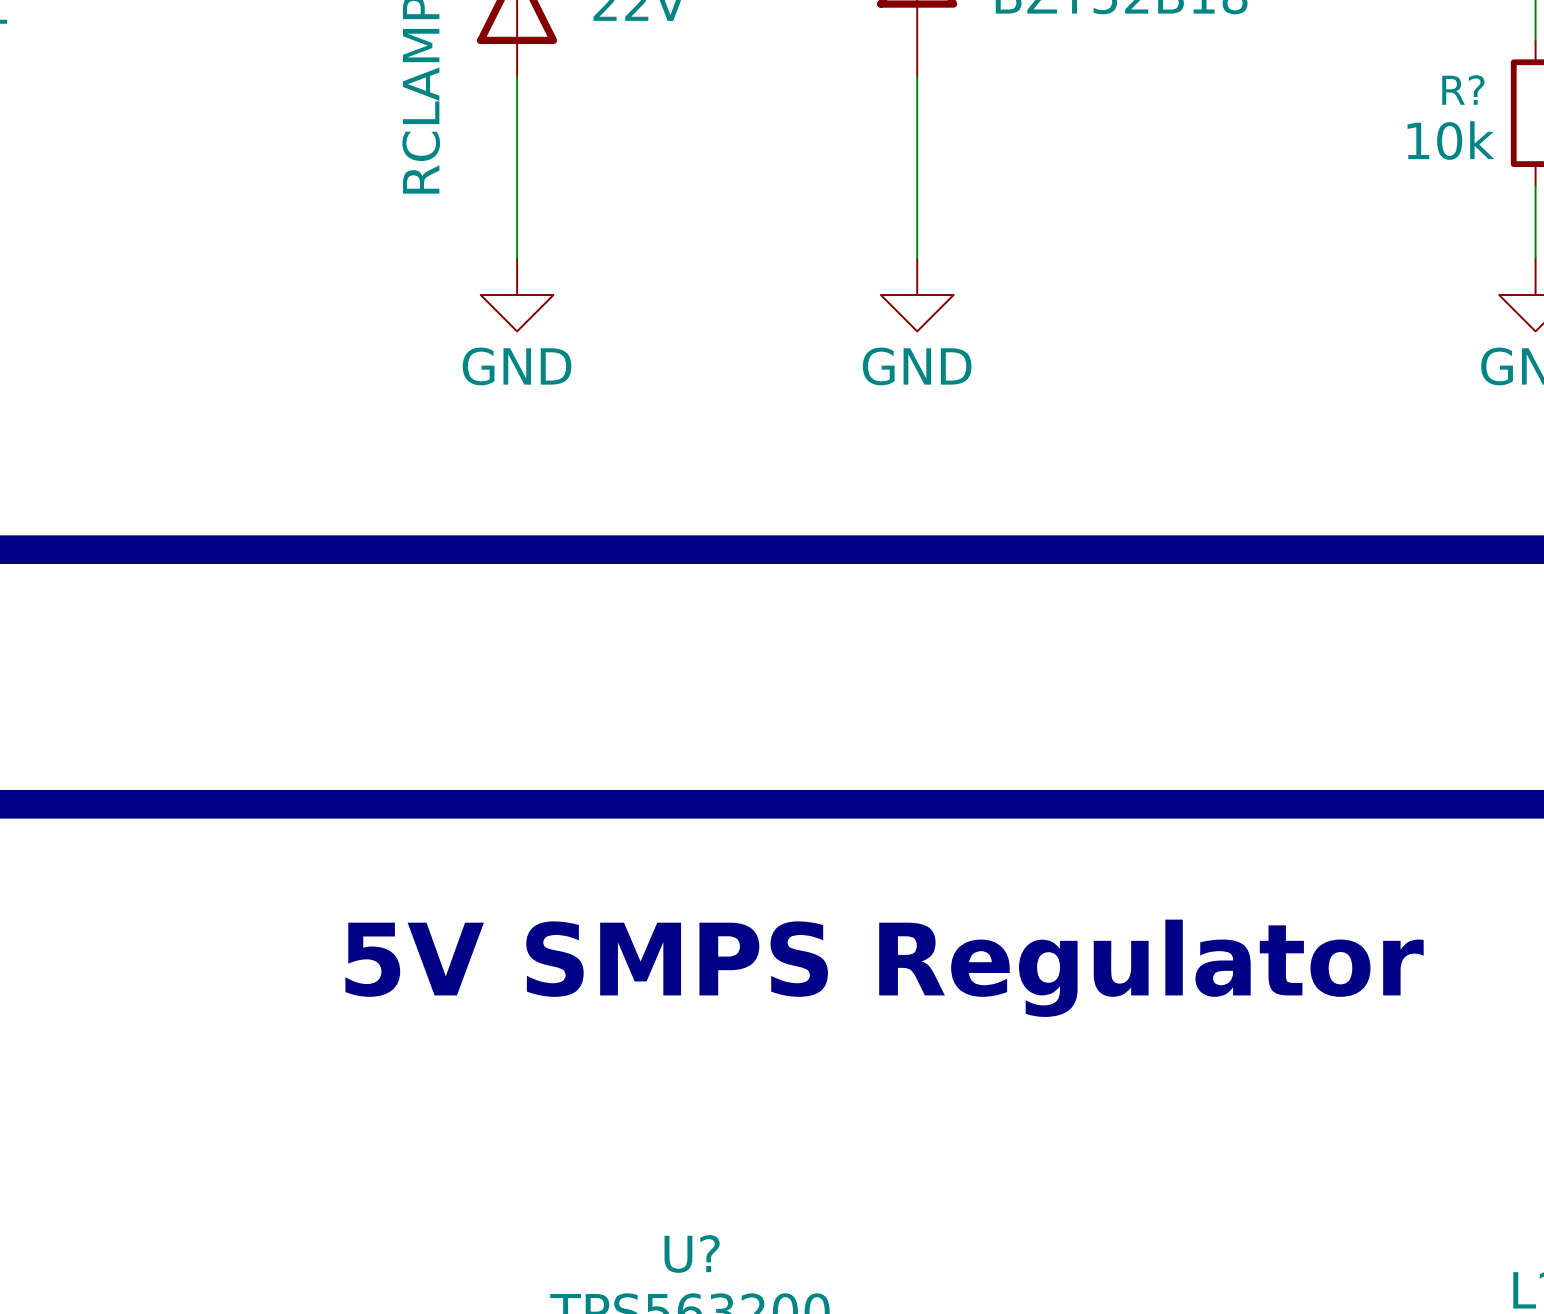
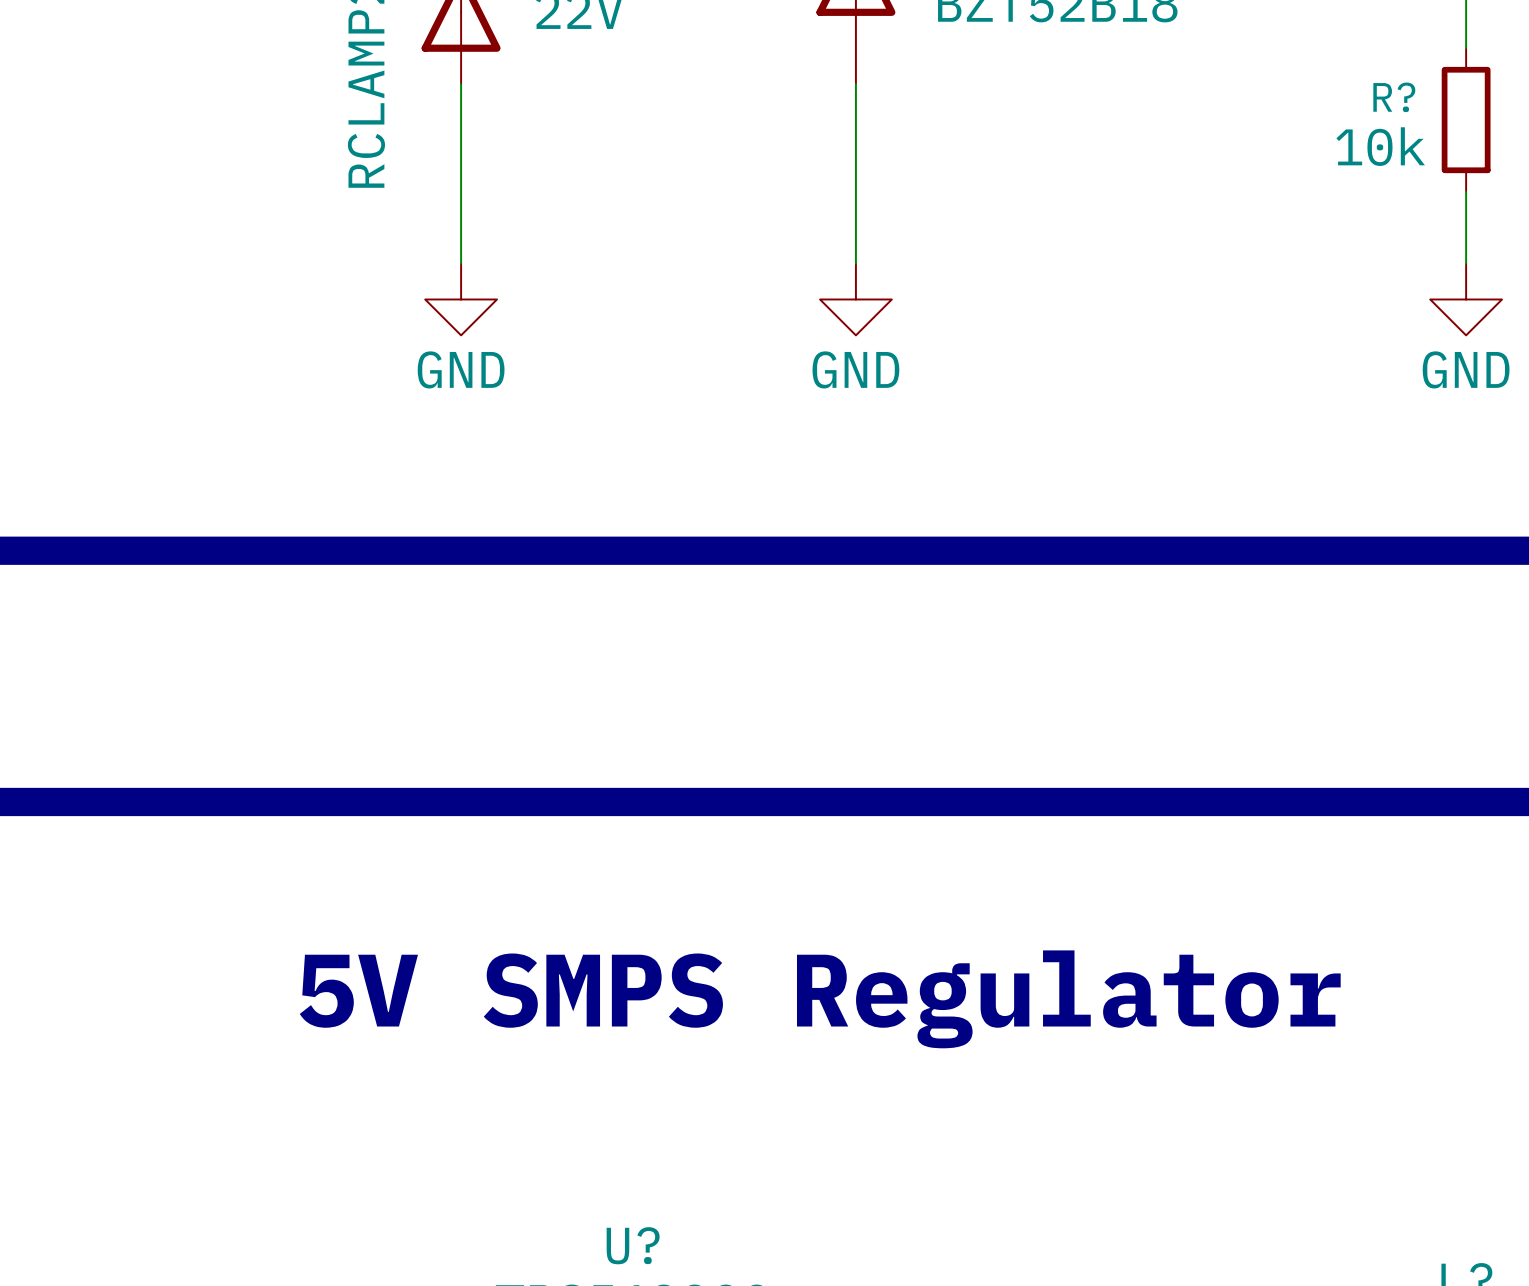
text position: 5V SMPS Regulator (884, 968) -> 5V SMPS Regulator (820, 999)

